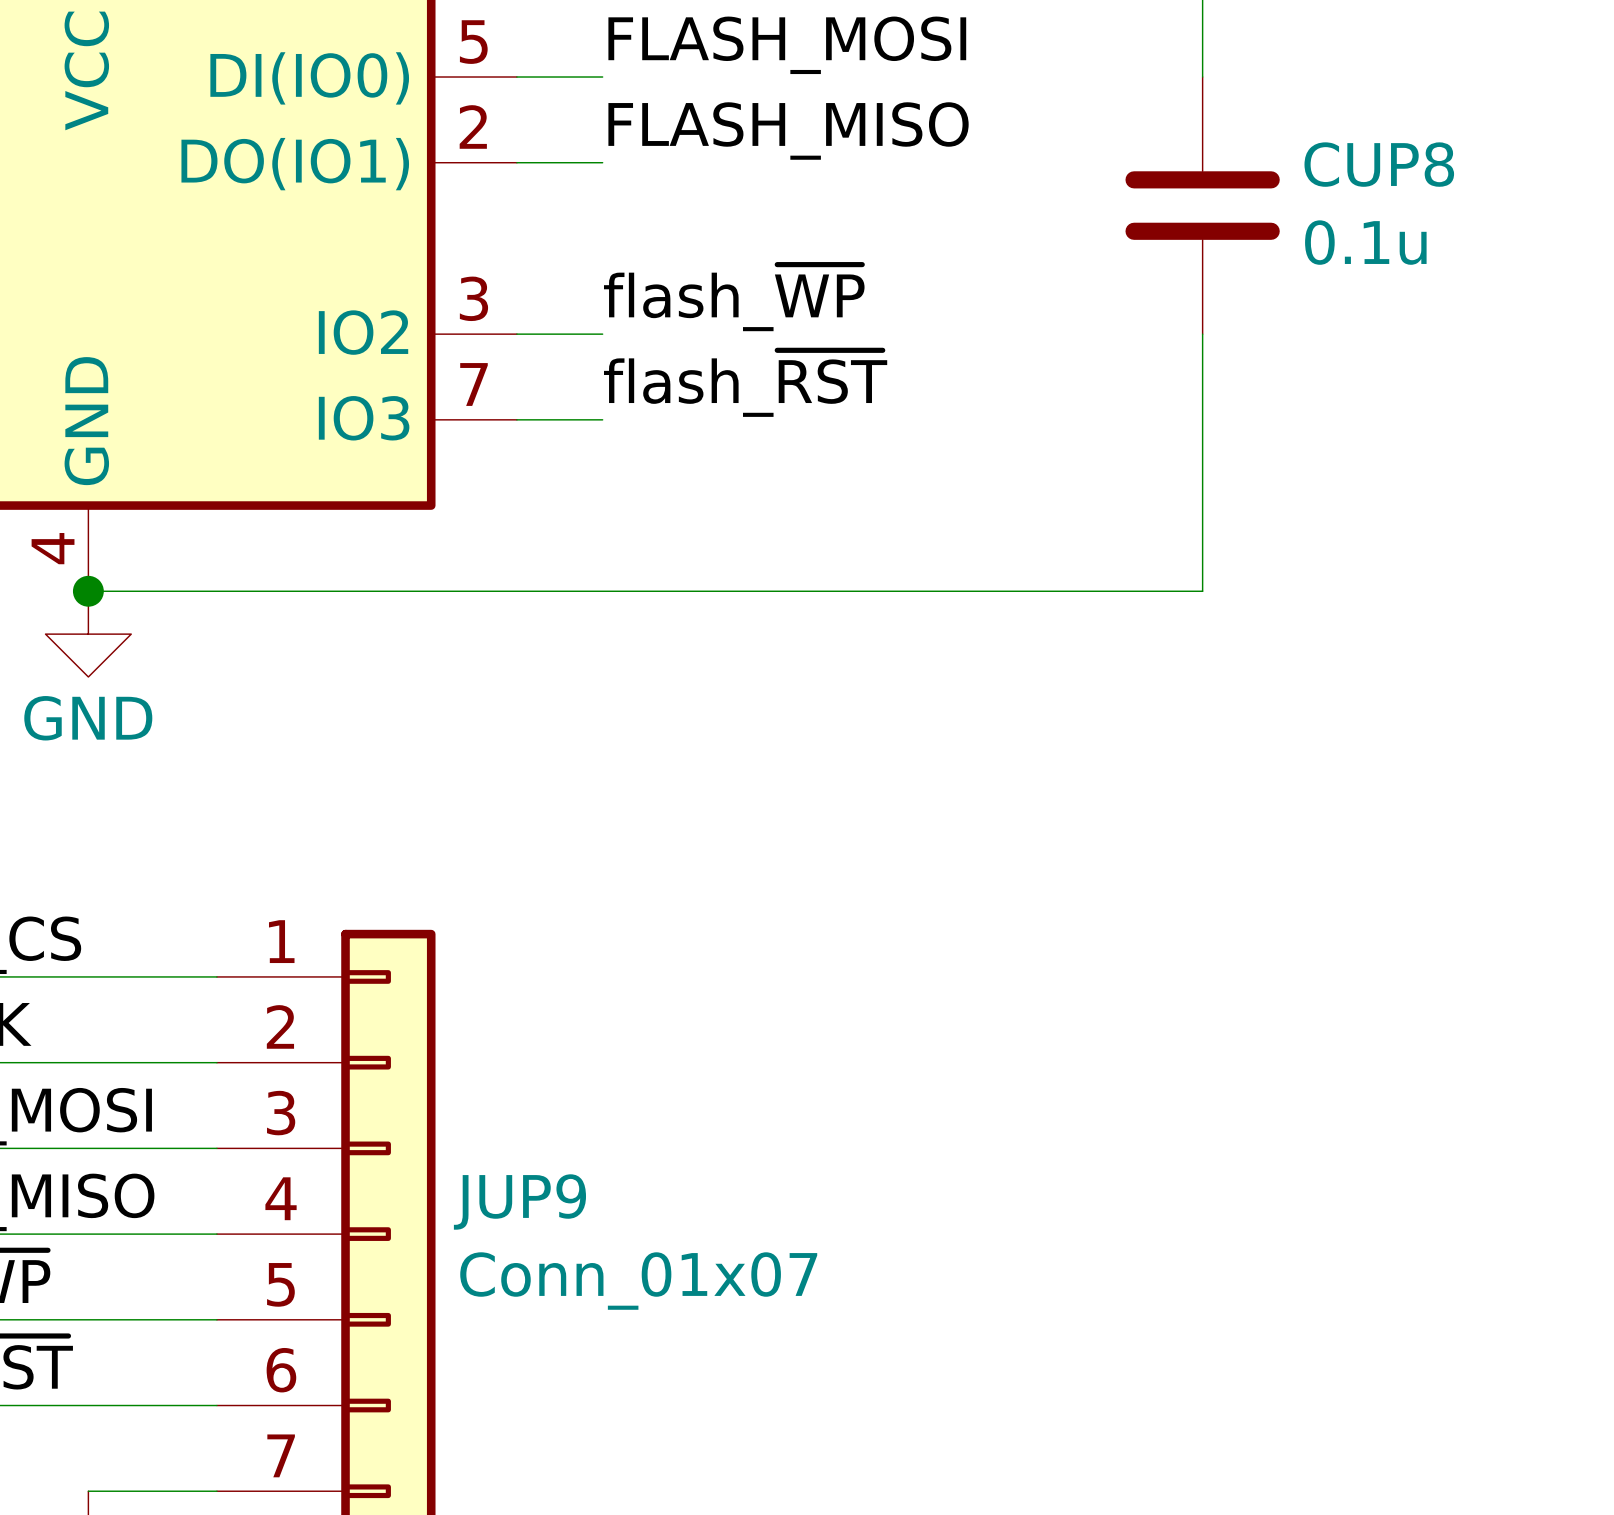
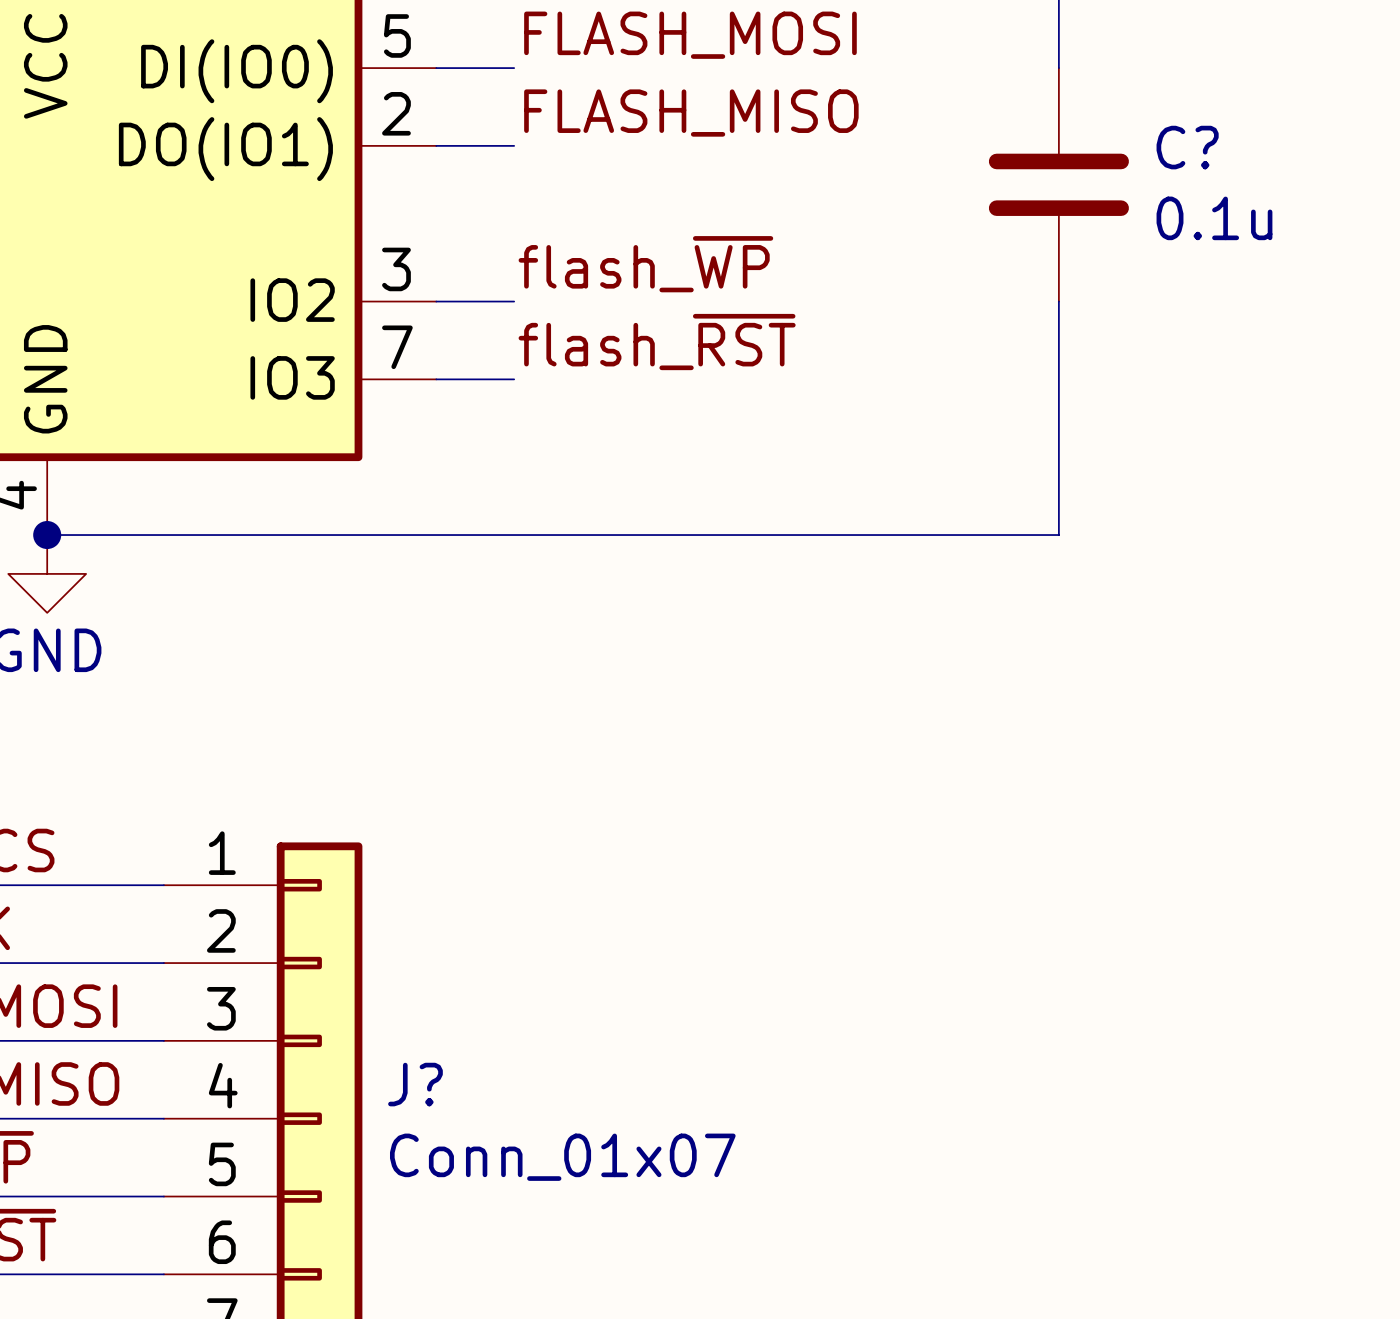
CUP8 name: CUP8 (1379, 164) -> C? (1187, 147)
JUP9 name: JUP9 (519, 1201) -> J? (415, 1084)

